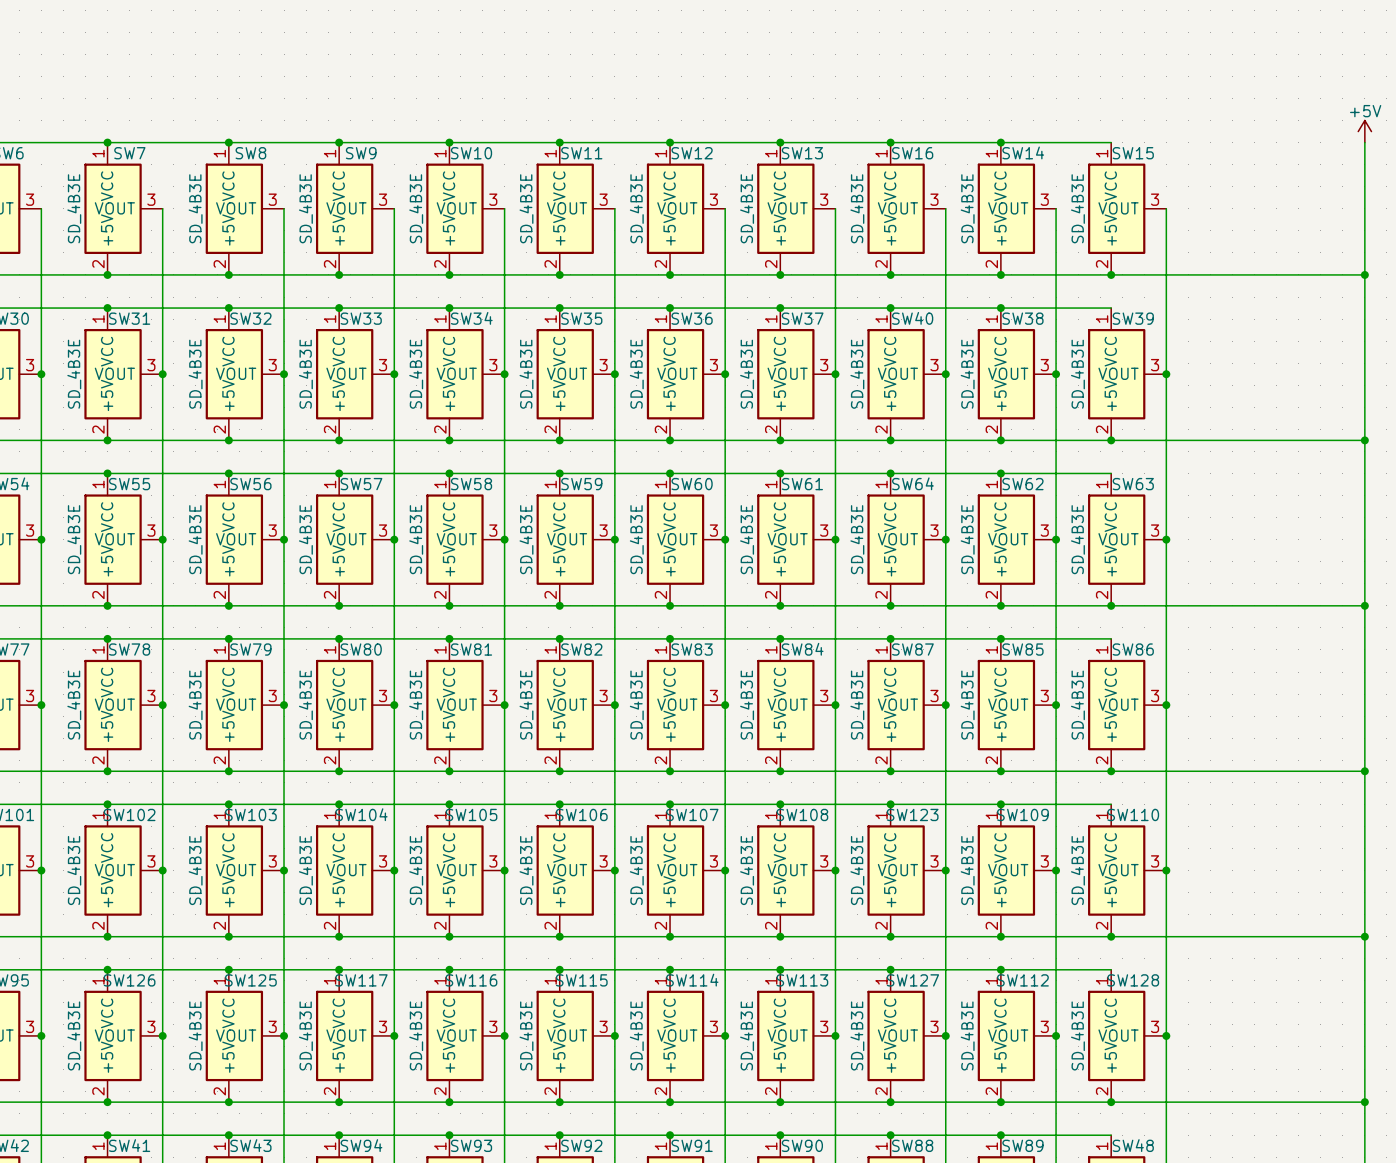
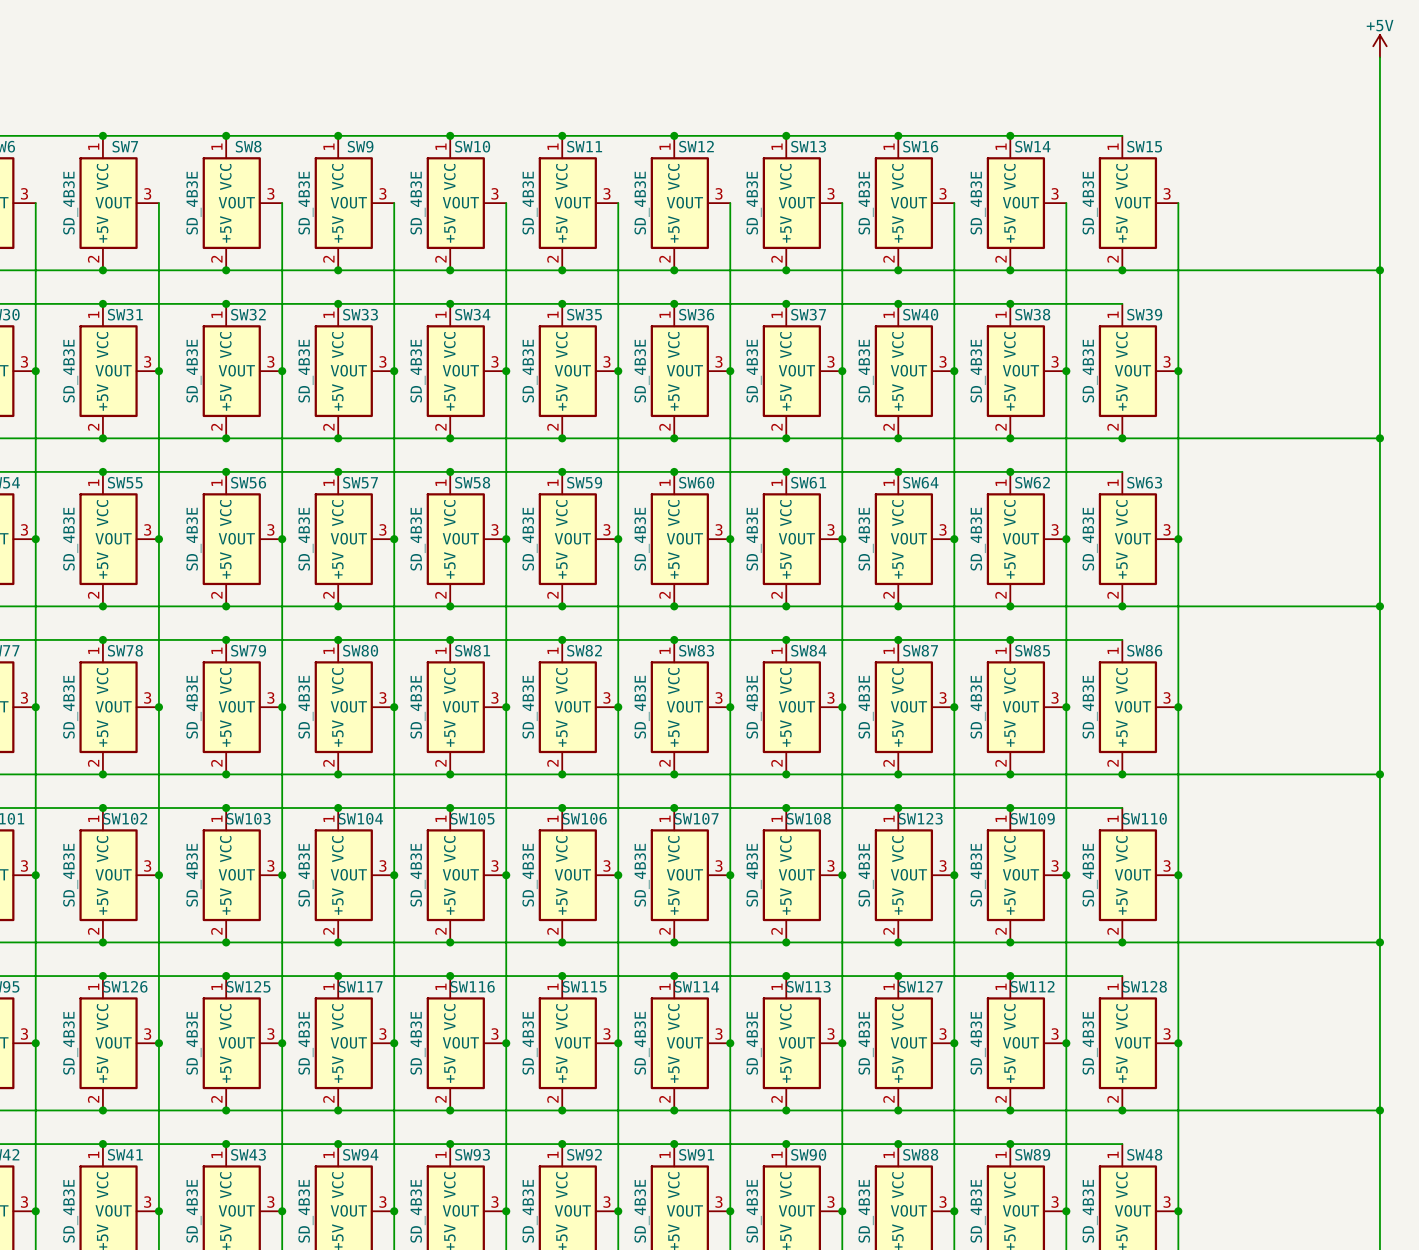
wire: none -> (1379, 57) (1379, 135)
power symbol position: +5V (1364, 131) -> +5V (1379, 46)

